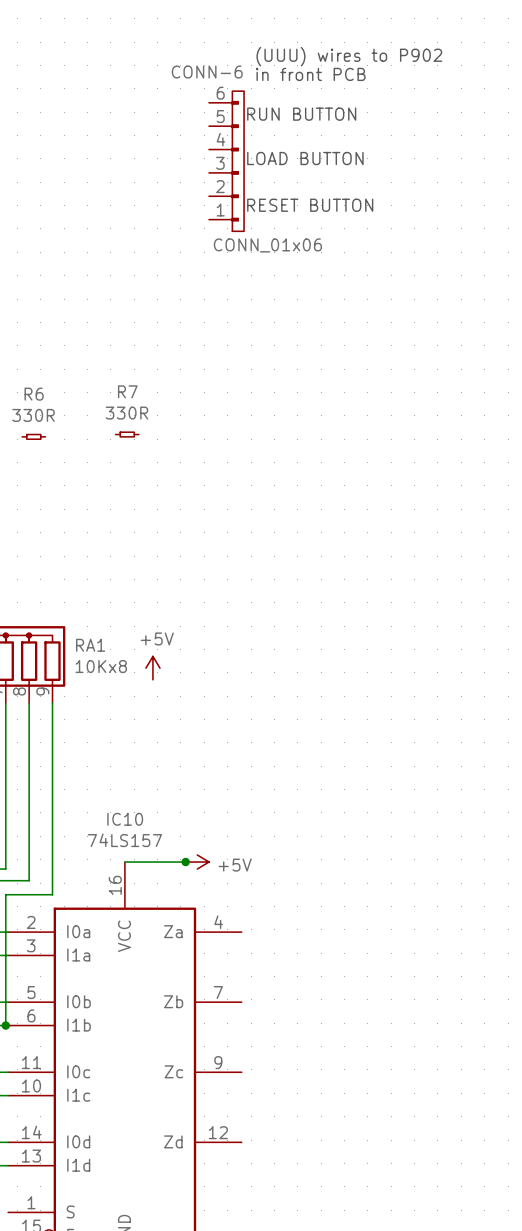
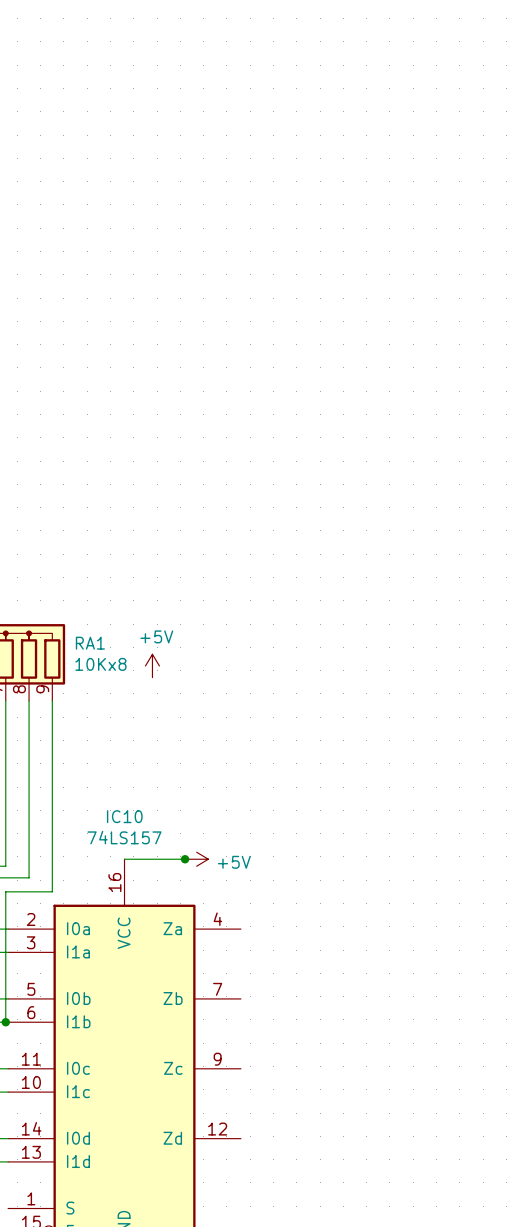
text: (UUU) wires to P902 (349, 56) -> none
text: in front PCB (310, 74) -> none
text: RUN BUTTON (301, 114) -> none
text: LOAD BUTTON (305, 158) -> none
CONN-6: CONN_01x06 (226, 161) -> none
text: RESET BUTTON (310, 205) -> none
R7: 330R (127, 434) -> none
R6: 330R (33, 436) -> none

